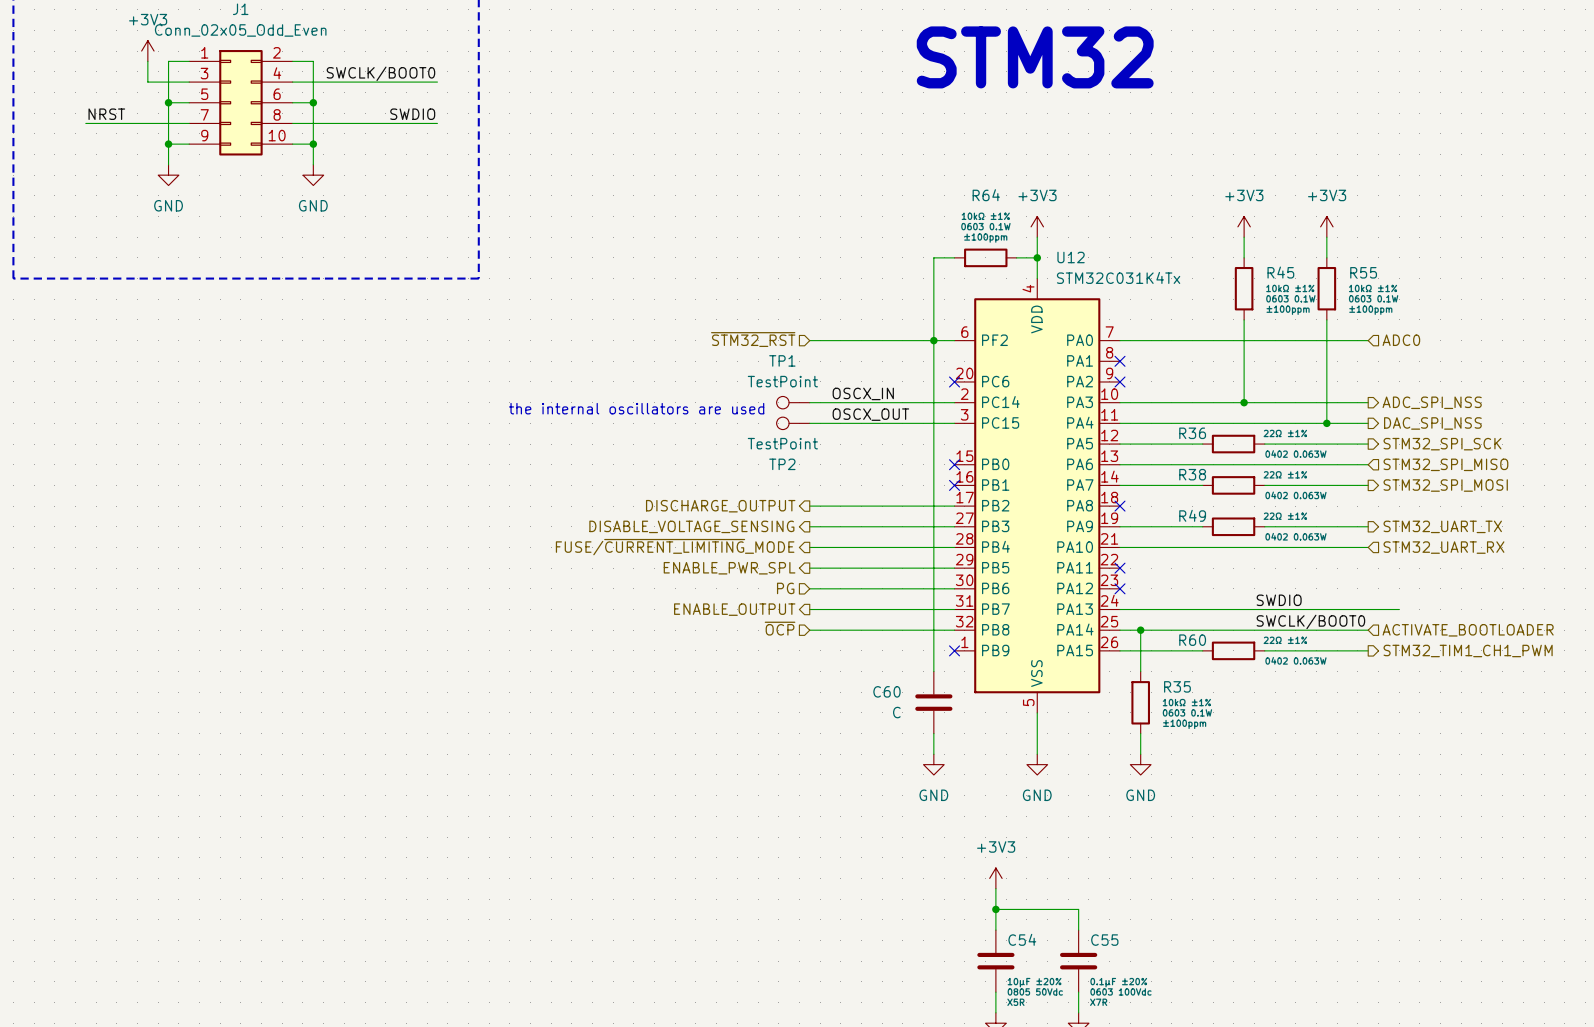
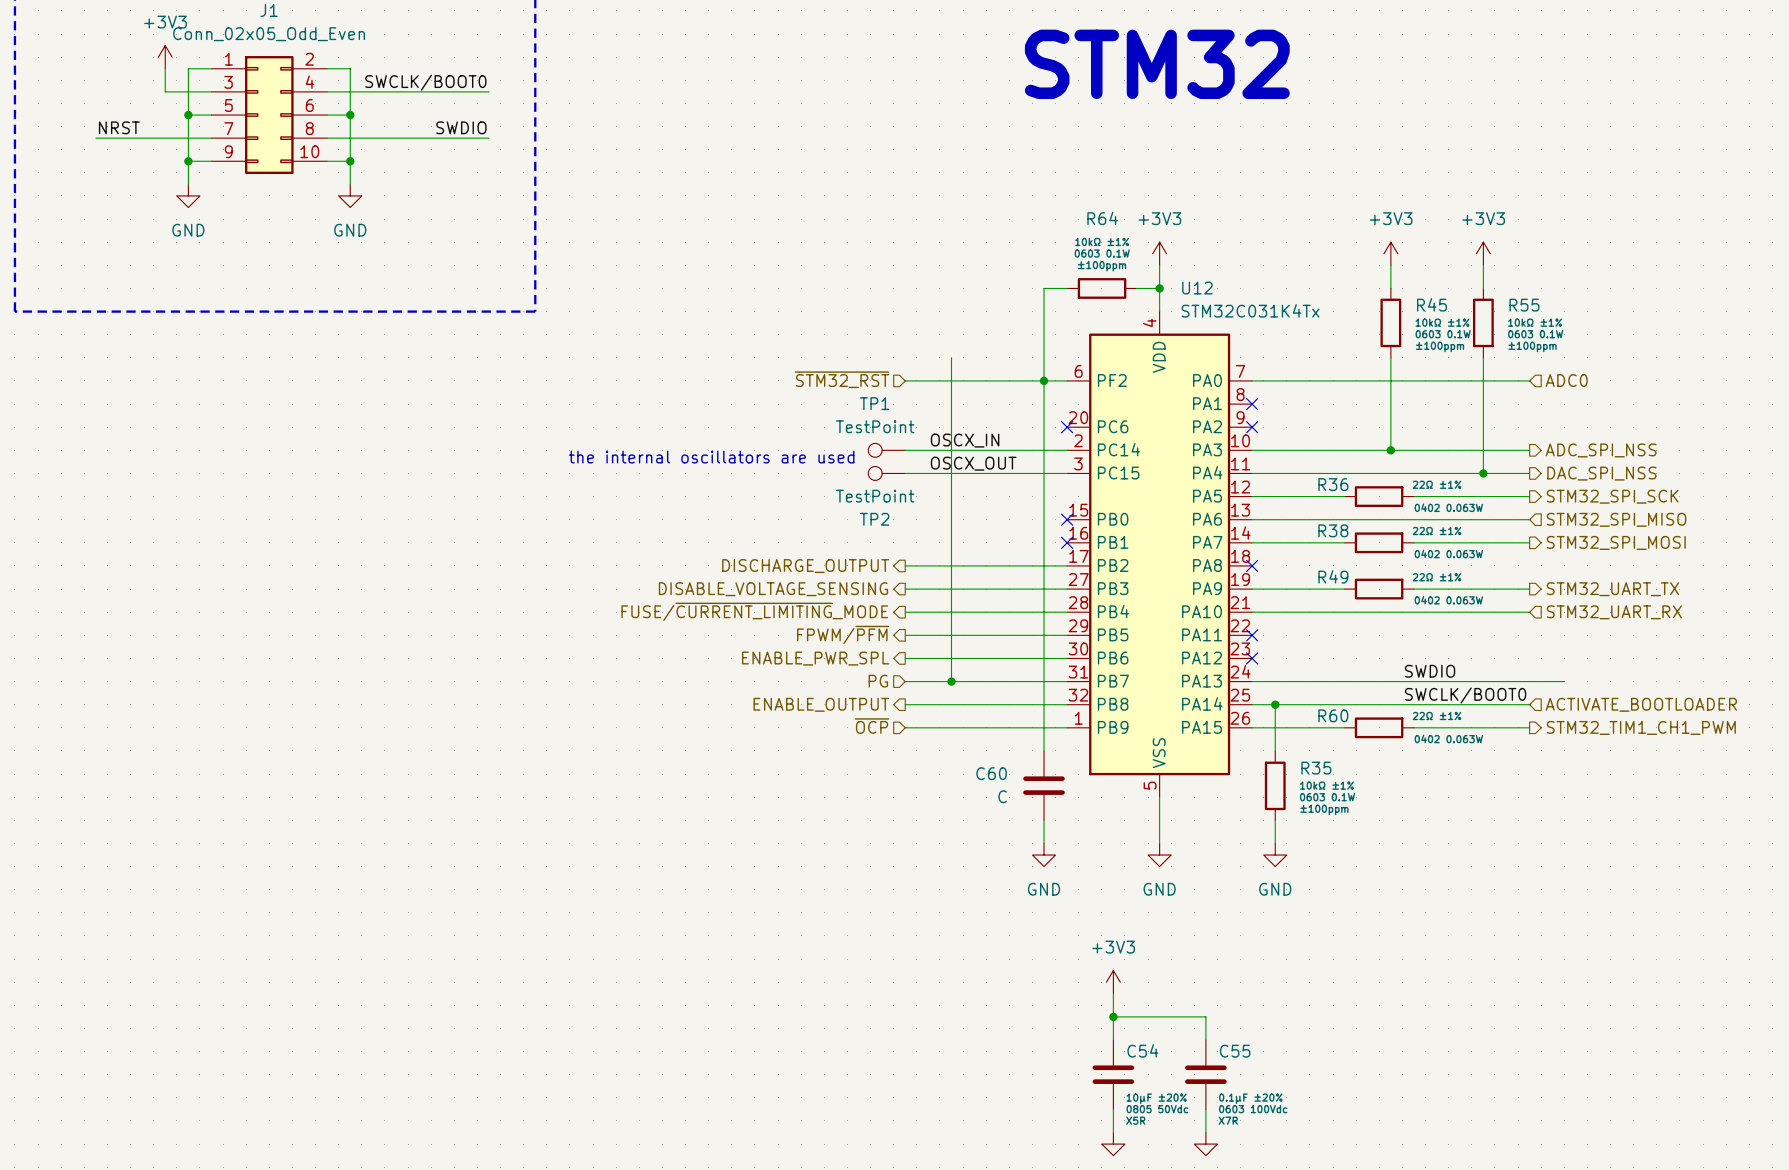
wire: none -> (951, 357) (951, 681)
hierarchical label: ENABLE_PWR_SPL (729, 568) -> FPWM/~{PFM} (843, 634)
hierarchical label shape: input (785, 588) -> output (815, 658)
hierarchical label: PG (785, 588) -> ENABLE_PWR_SPL (815, 658)
hierarchical label shape: output (734, 609) -> input (878, 681)
hierarchical label: ENABLE_OUTPUT (734, 609) -> PG (878, 681)
junction: none -> (951, 681)
hierarchical label shape: input (780, 628) -> output (821, 704)
hierarchical label: ~{OCP} (780, 628) -> ENABLE_OUTPUT (821, 704)
hierarchical label: none -> ~{OCP} (872, 726)
wire: none -> (905, 727) (1067, 727)
no-connect mark: (954, 650) -> none

